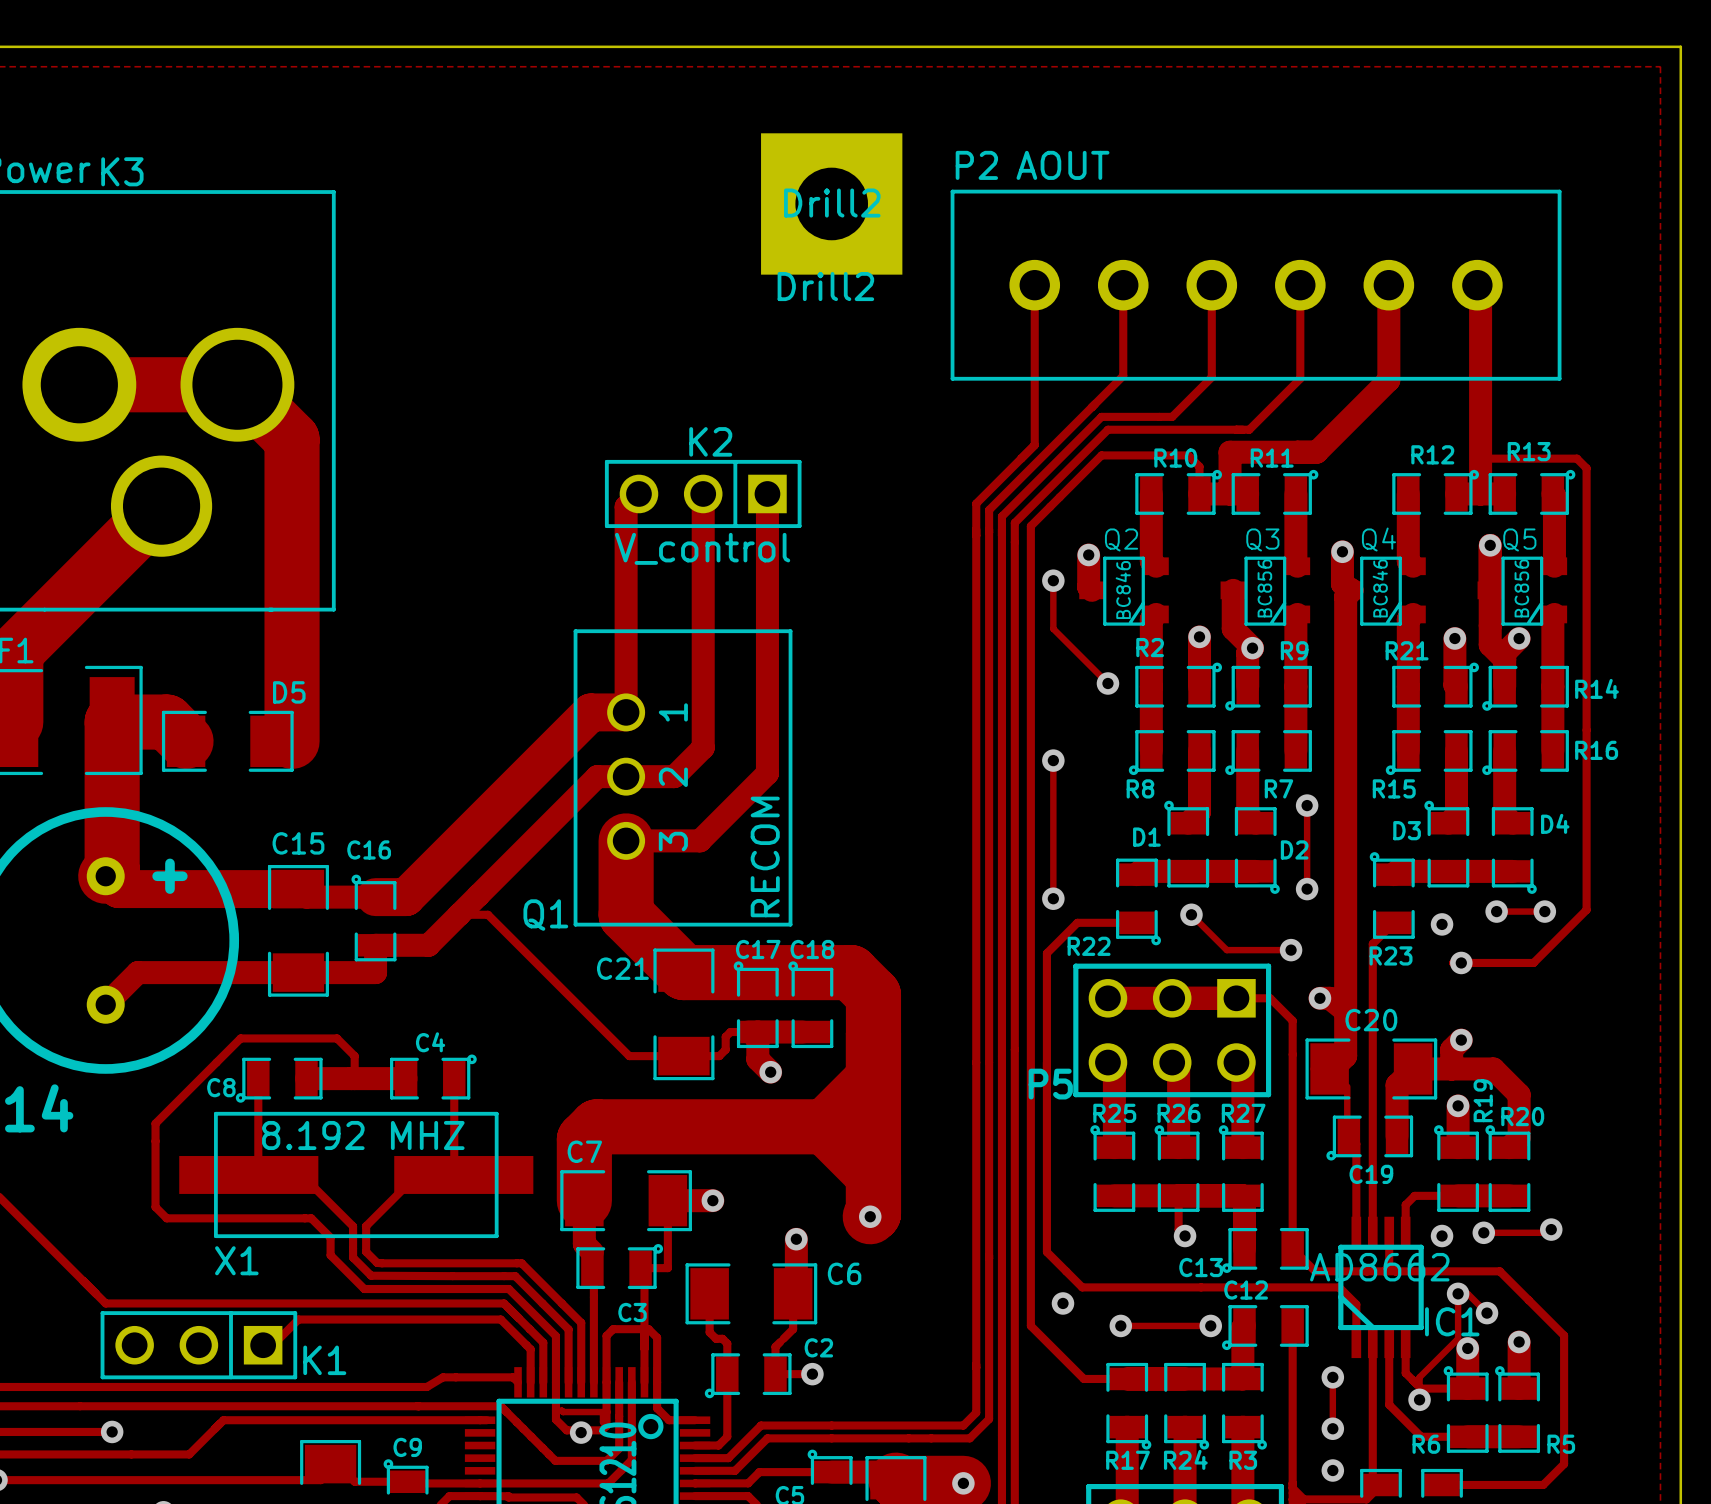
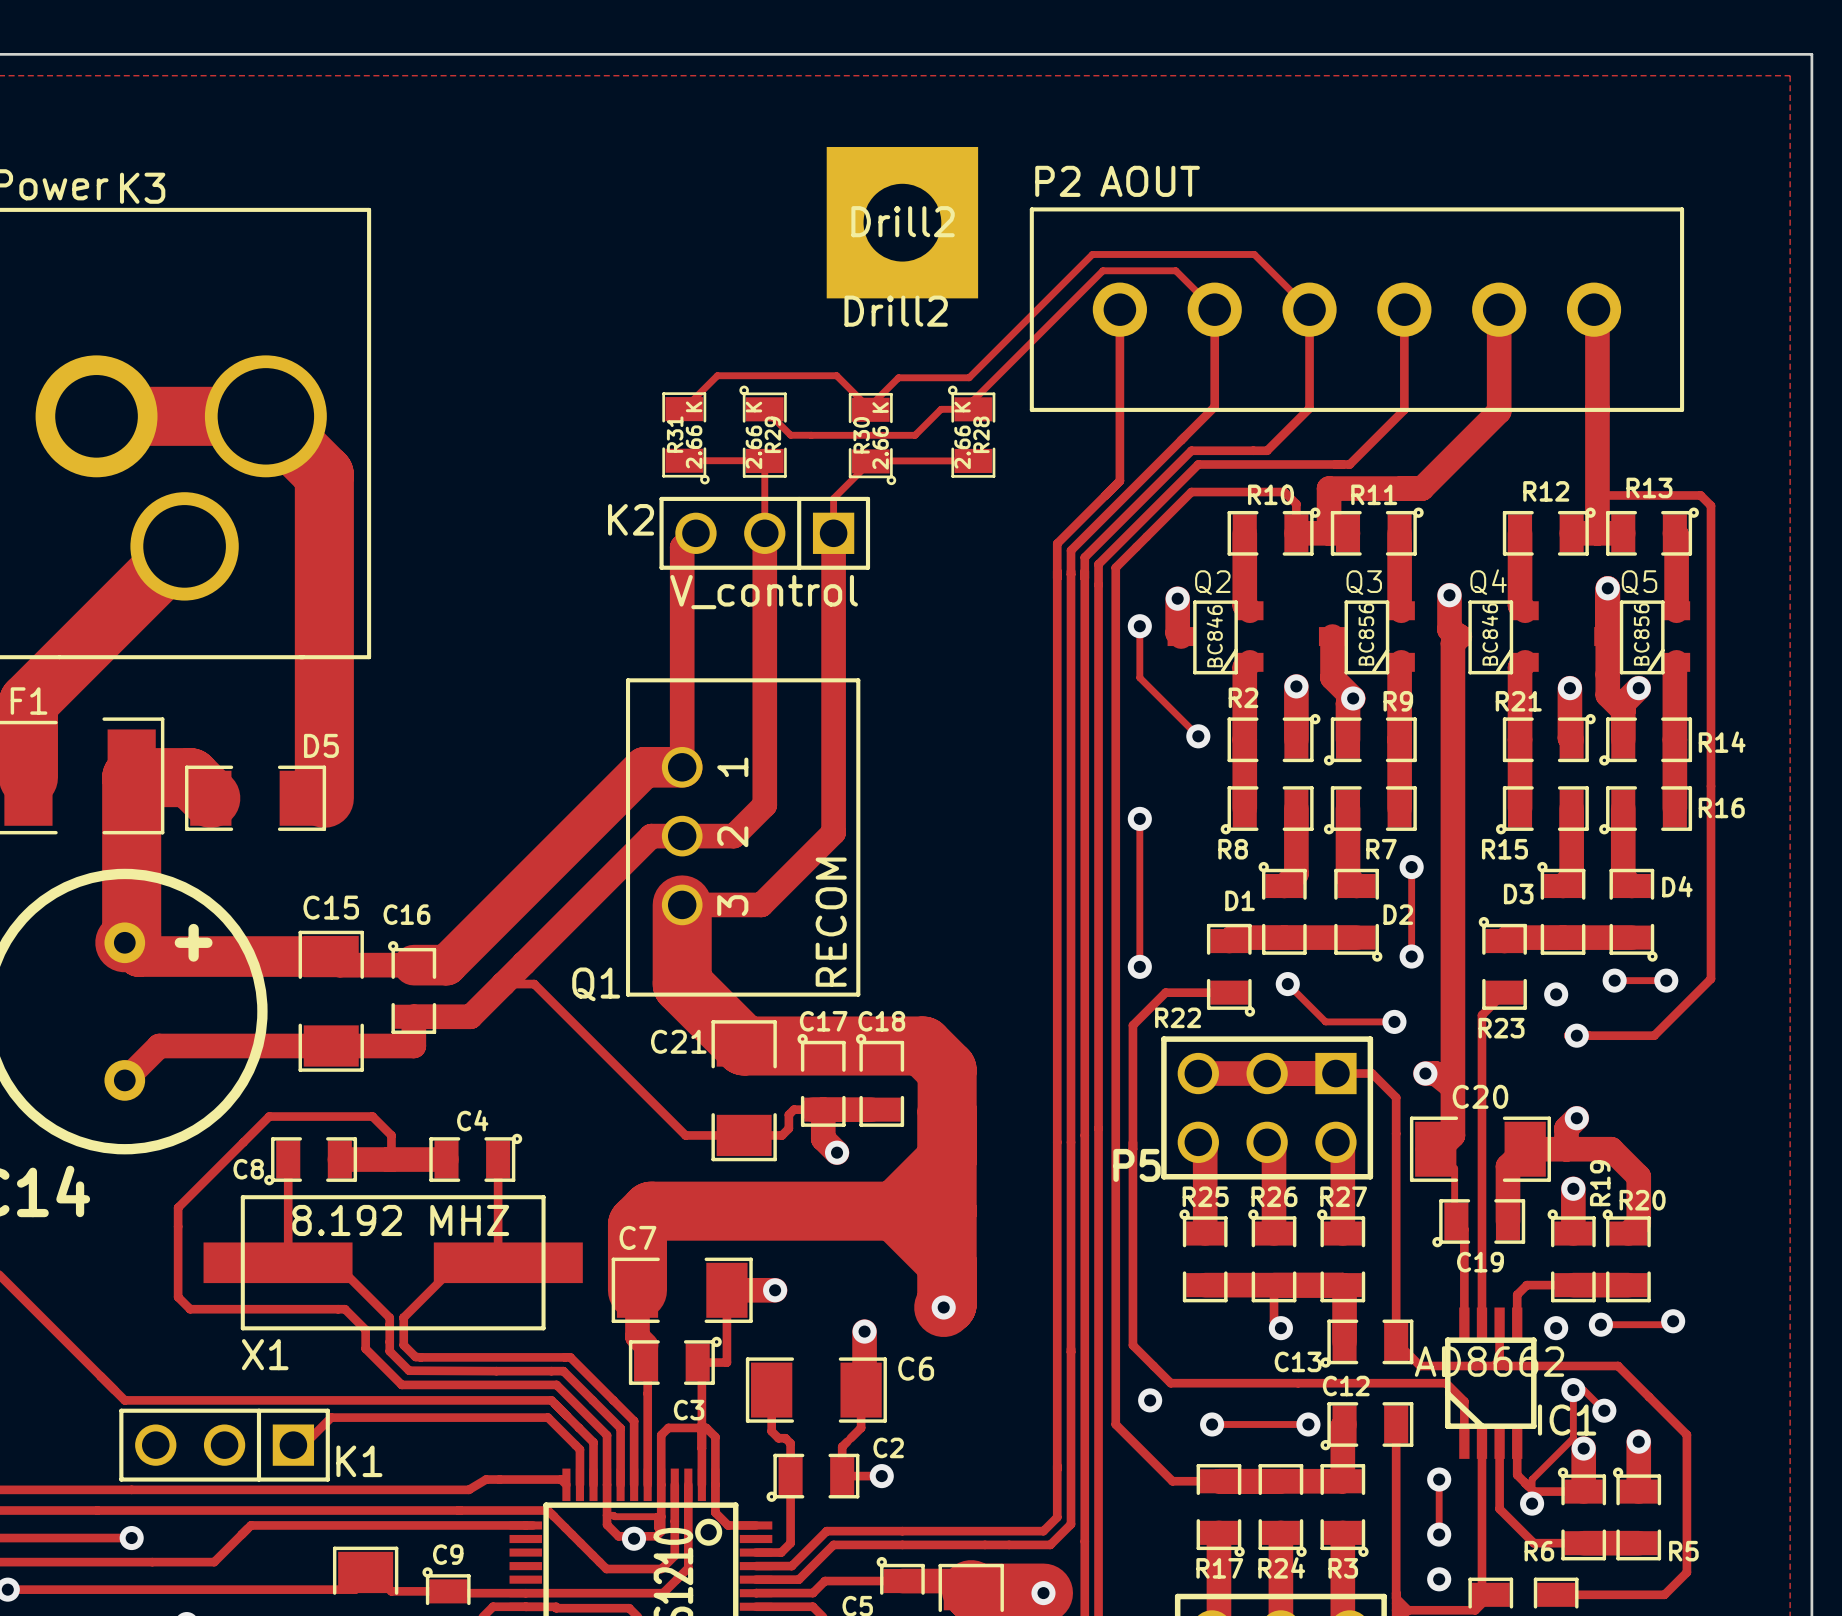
track: none -> (1214, 309) (1175, 270) (1102, 270) (973, 400) (973, 409) (941, 409) (915, 435) (811, 435)
track: none -> (1309, 309) (1254, 254) (1092, 254) (969, 377) (898, 377) (870, 405) (870, 409) (836, 375) (717, 375) (684, 408)
track: none -> (764, 409) (790, 435) (811, 435)
R29: none -> 2.66 K (763, 431)
R28: none -> 2.66 K (971, 431)
R31: none -> 2.66 K (685, 438)
R30: none -> 2.66 K (872, 439)
track: none -> (684, 460) (764, 460)
track: none -> (764, 460) (764, 533)
track: none -> (973, 460) (871, 460) (833, 498) (833, 533)
K2 name position: K2 (710, 441) -> K2 (631, 519)

